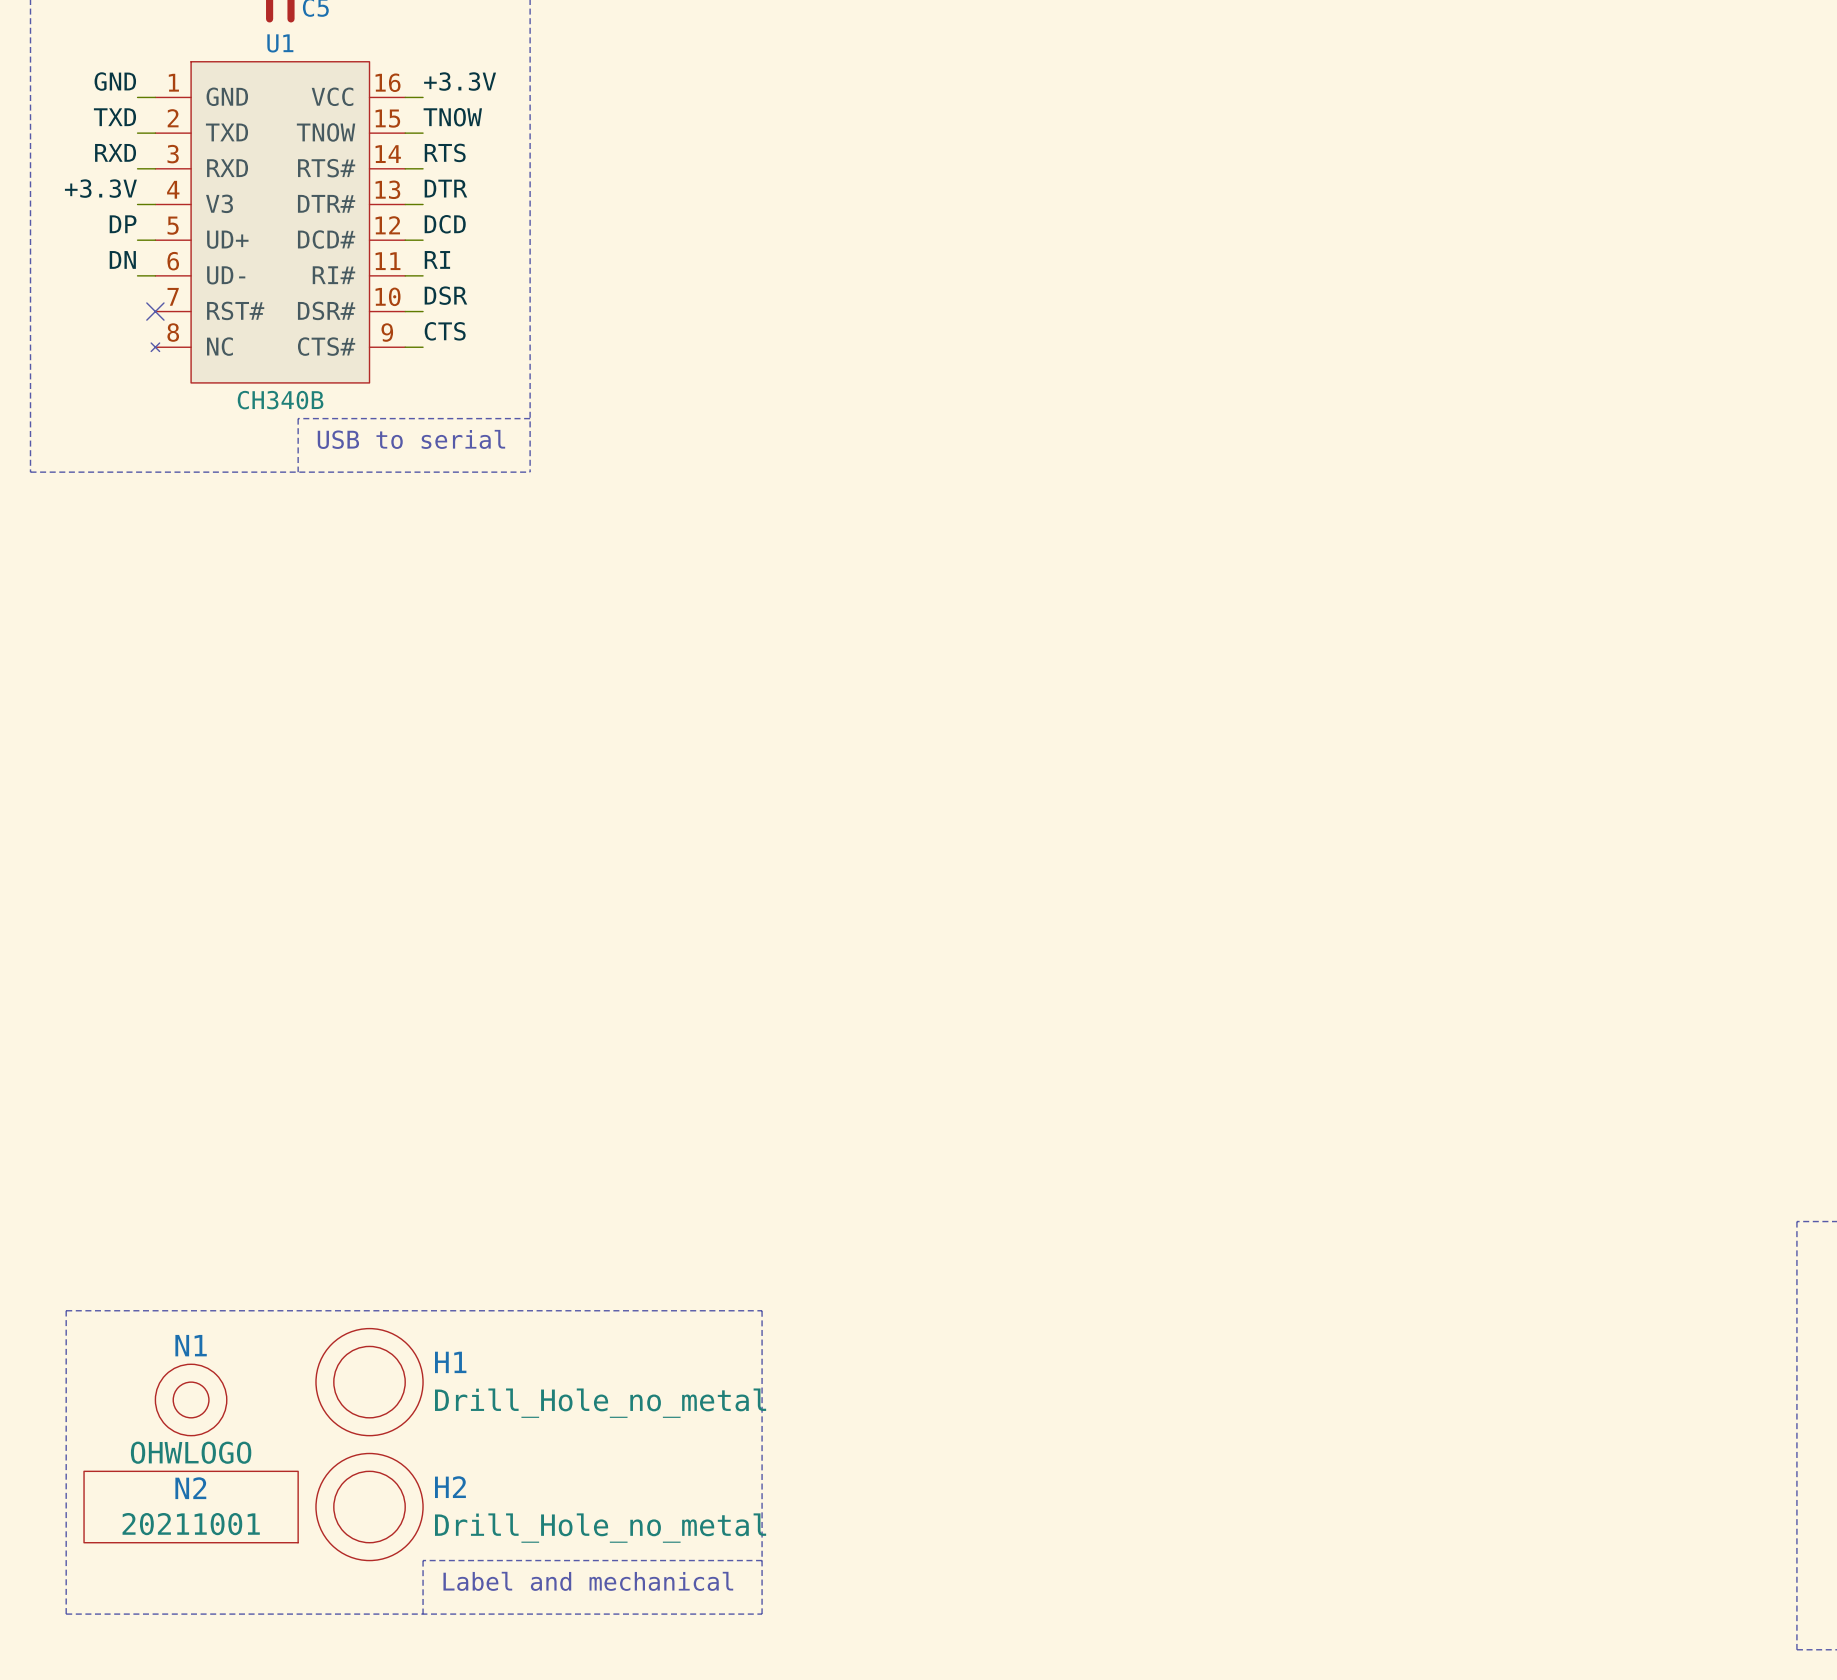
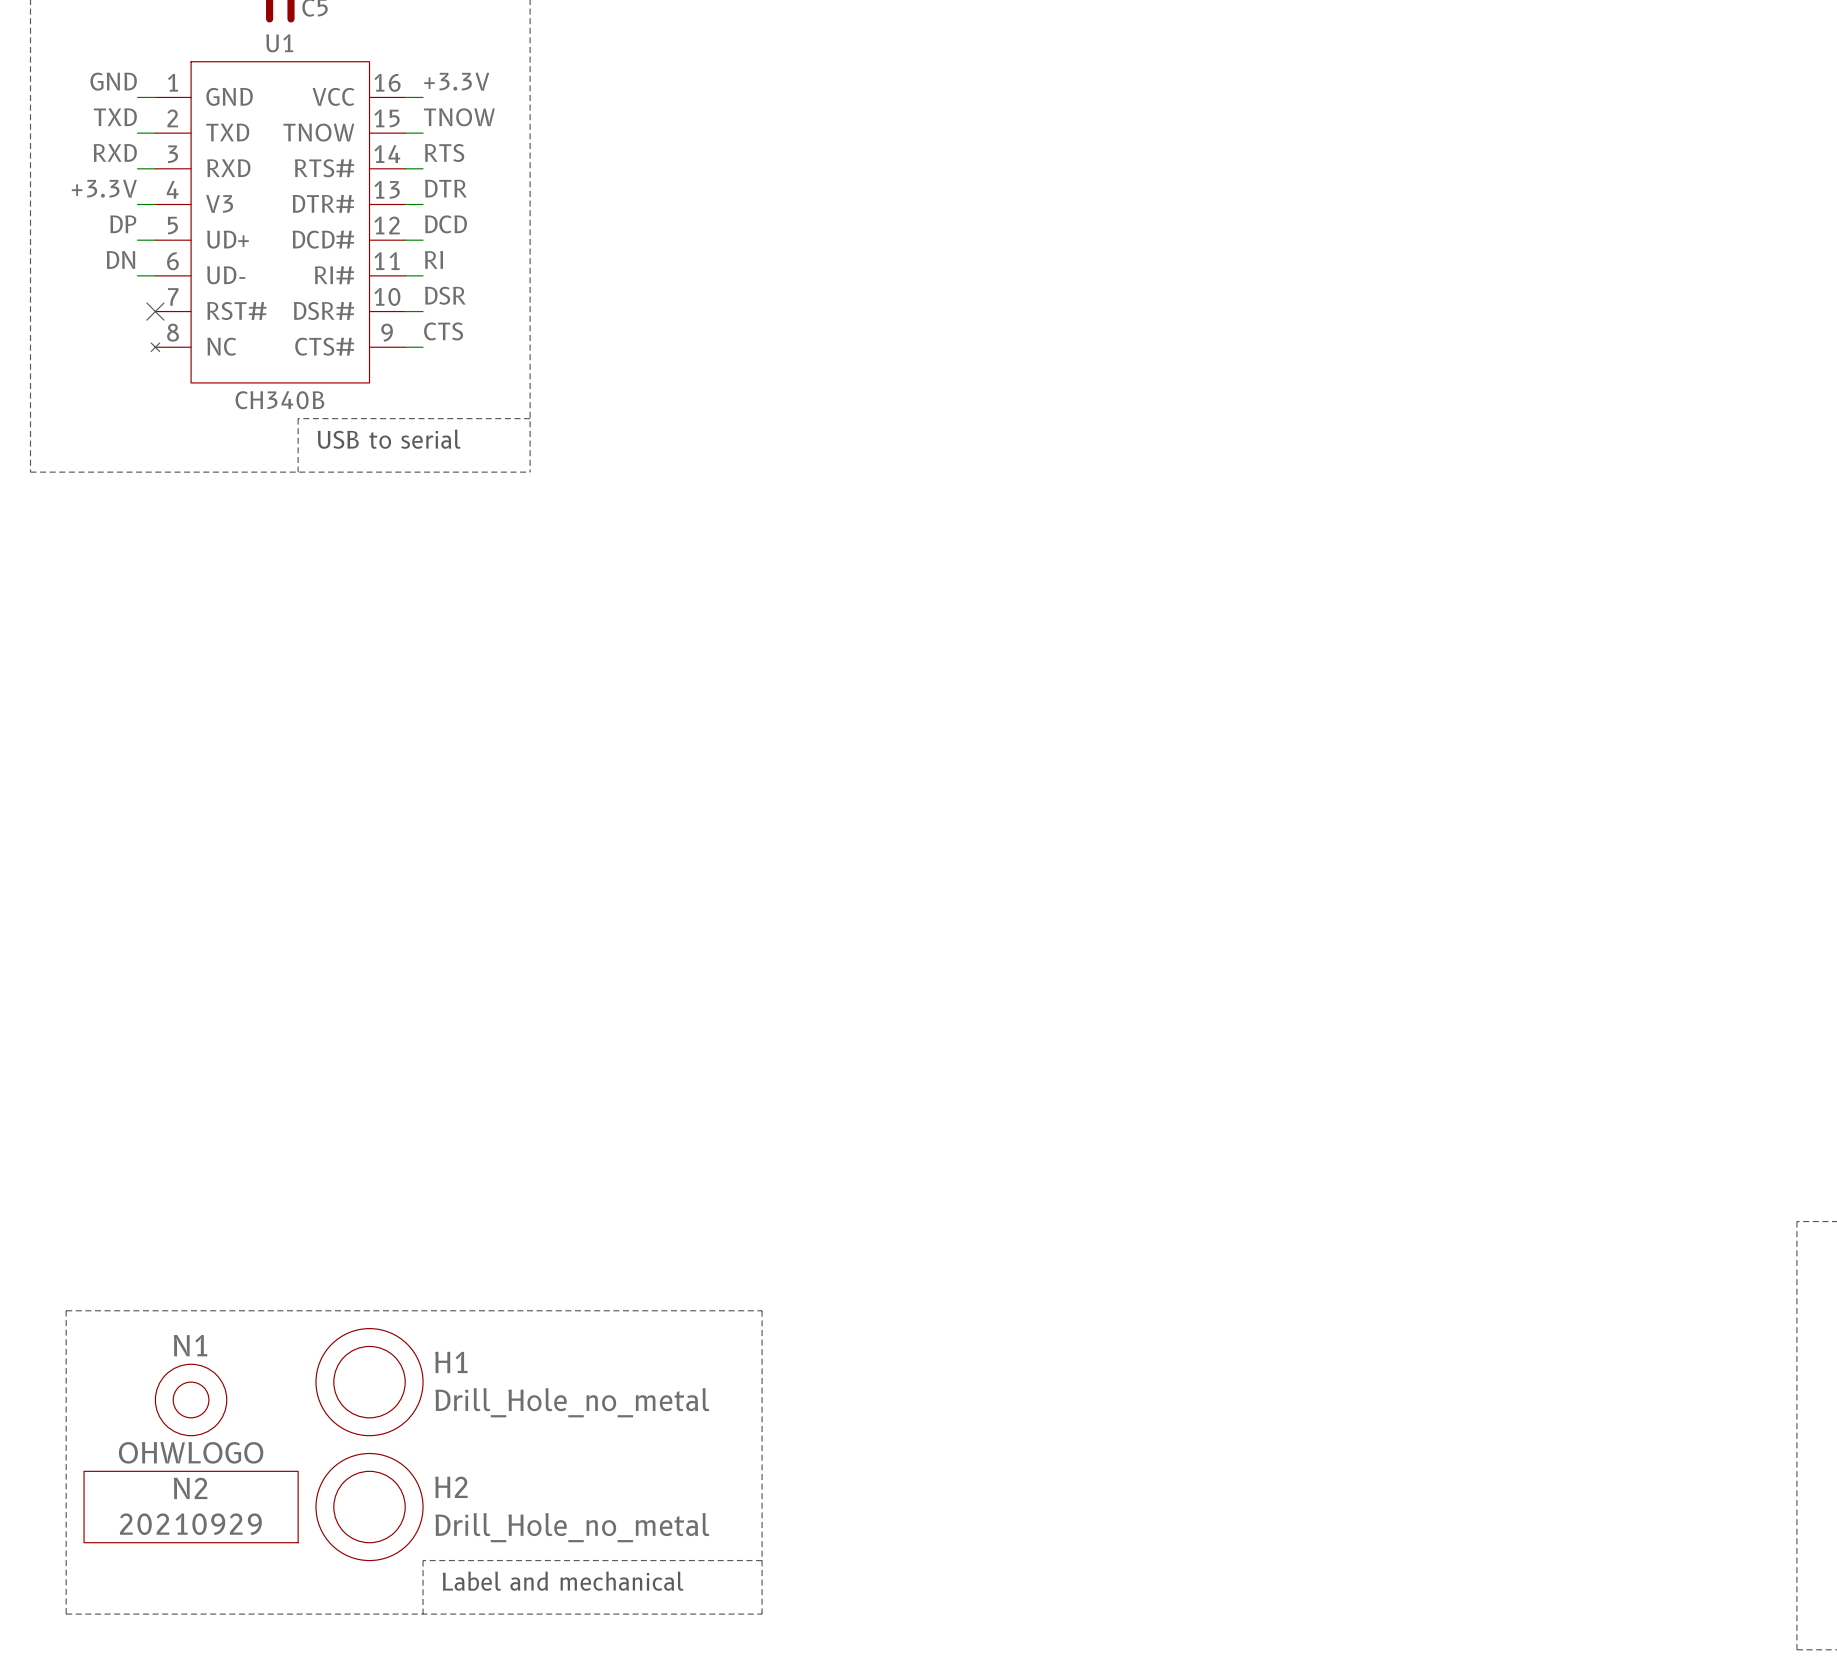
N2 value: 20211001 (191, 1524) -> 20210929 (190, 1524)

